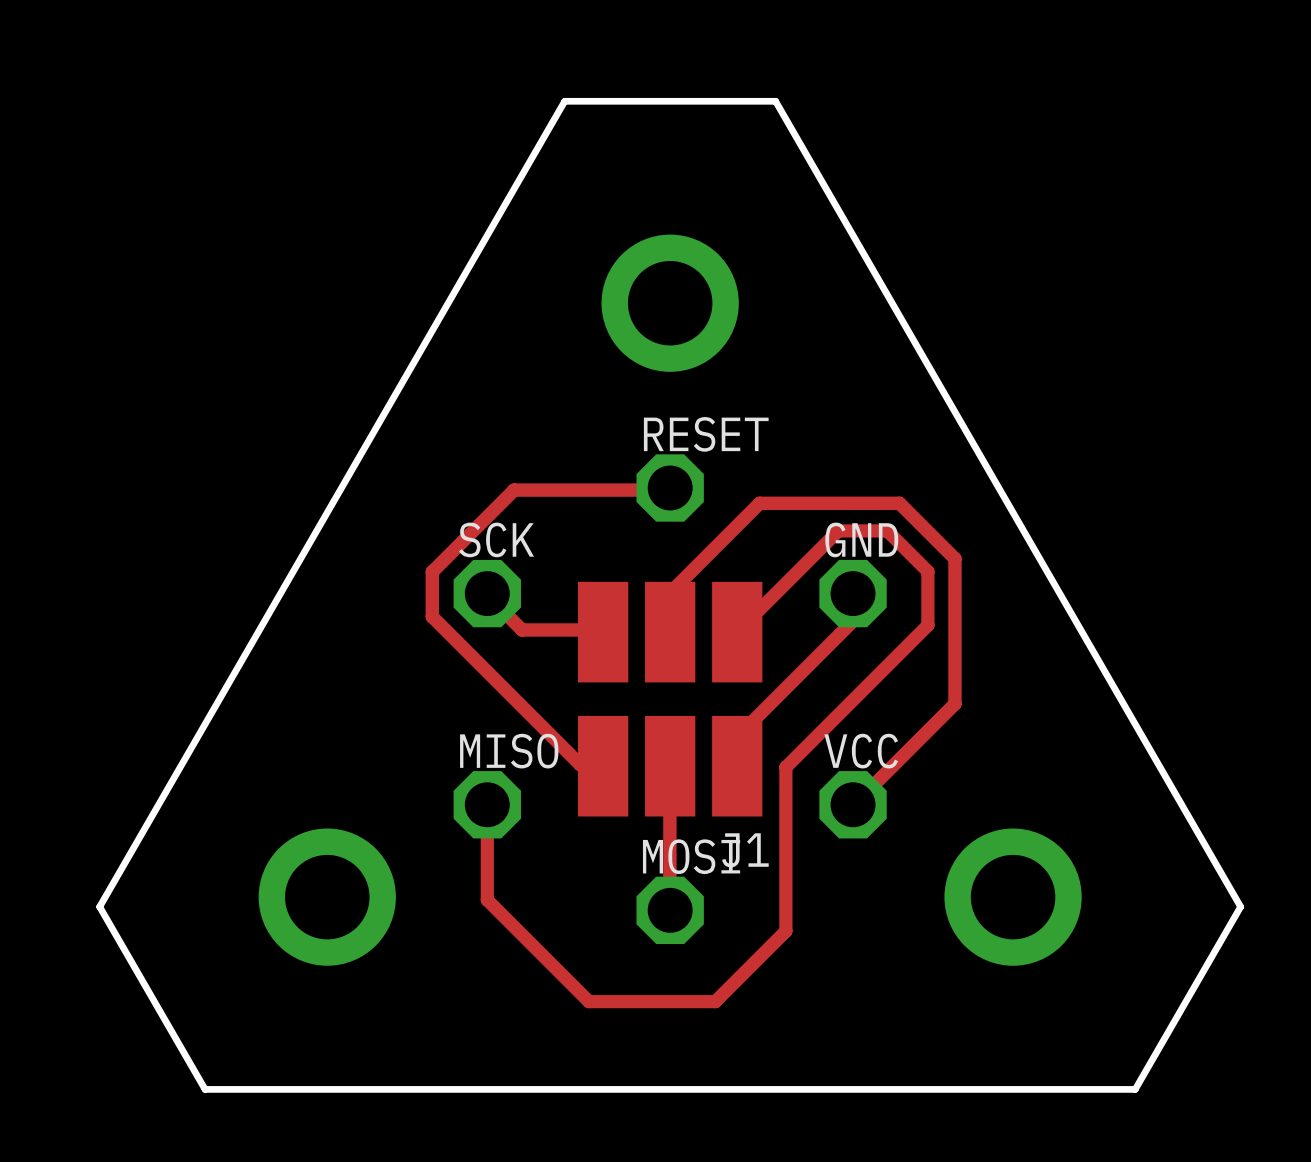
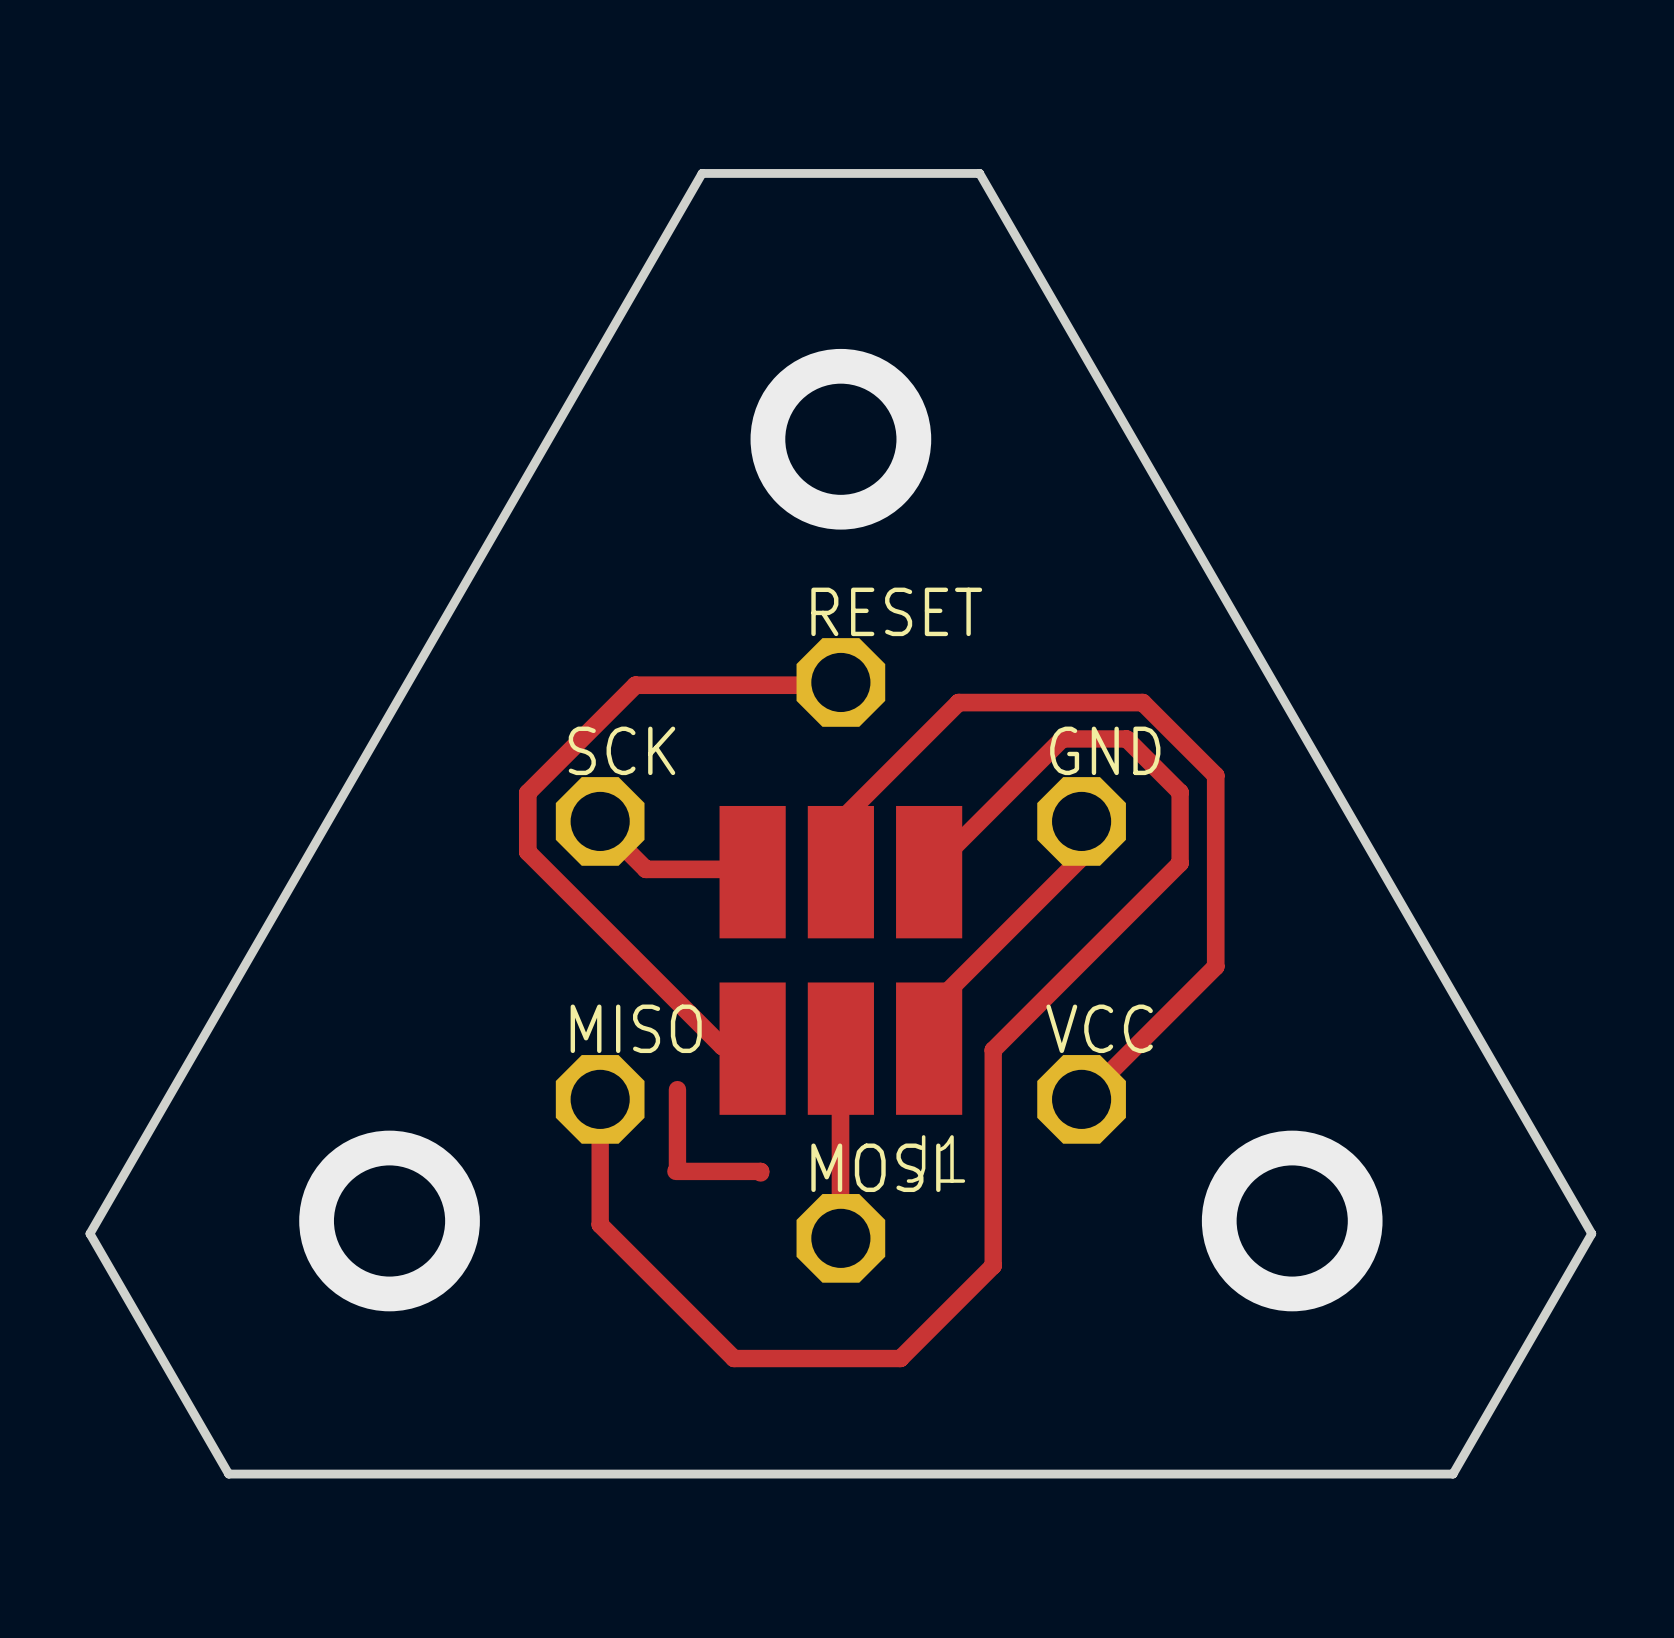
track: none -> (677, 1089) (677, 1168)
track: none -> (675, 1171) (760, 1171) (760, 1172)

